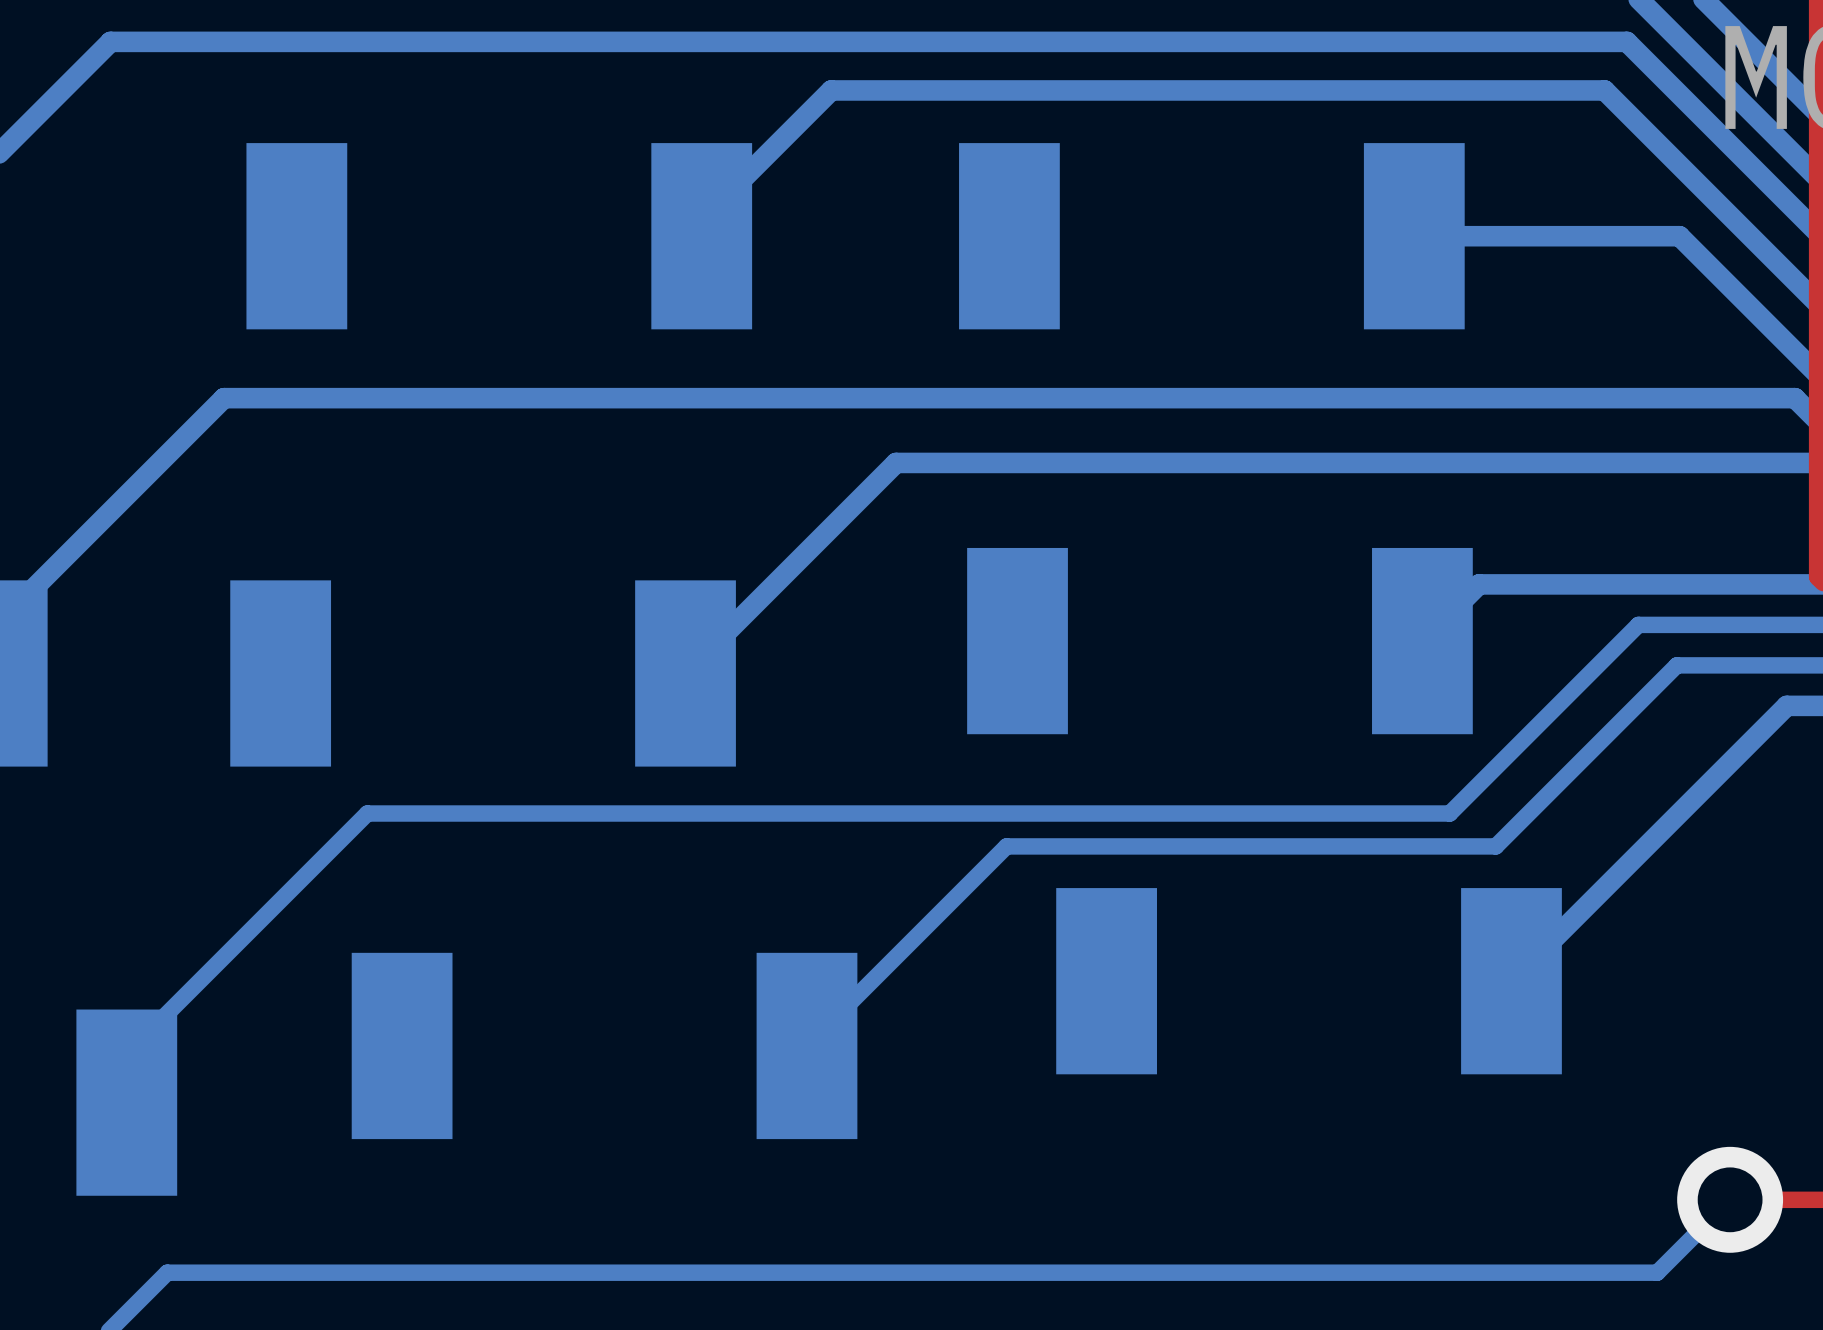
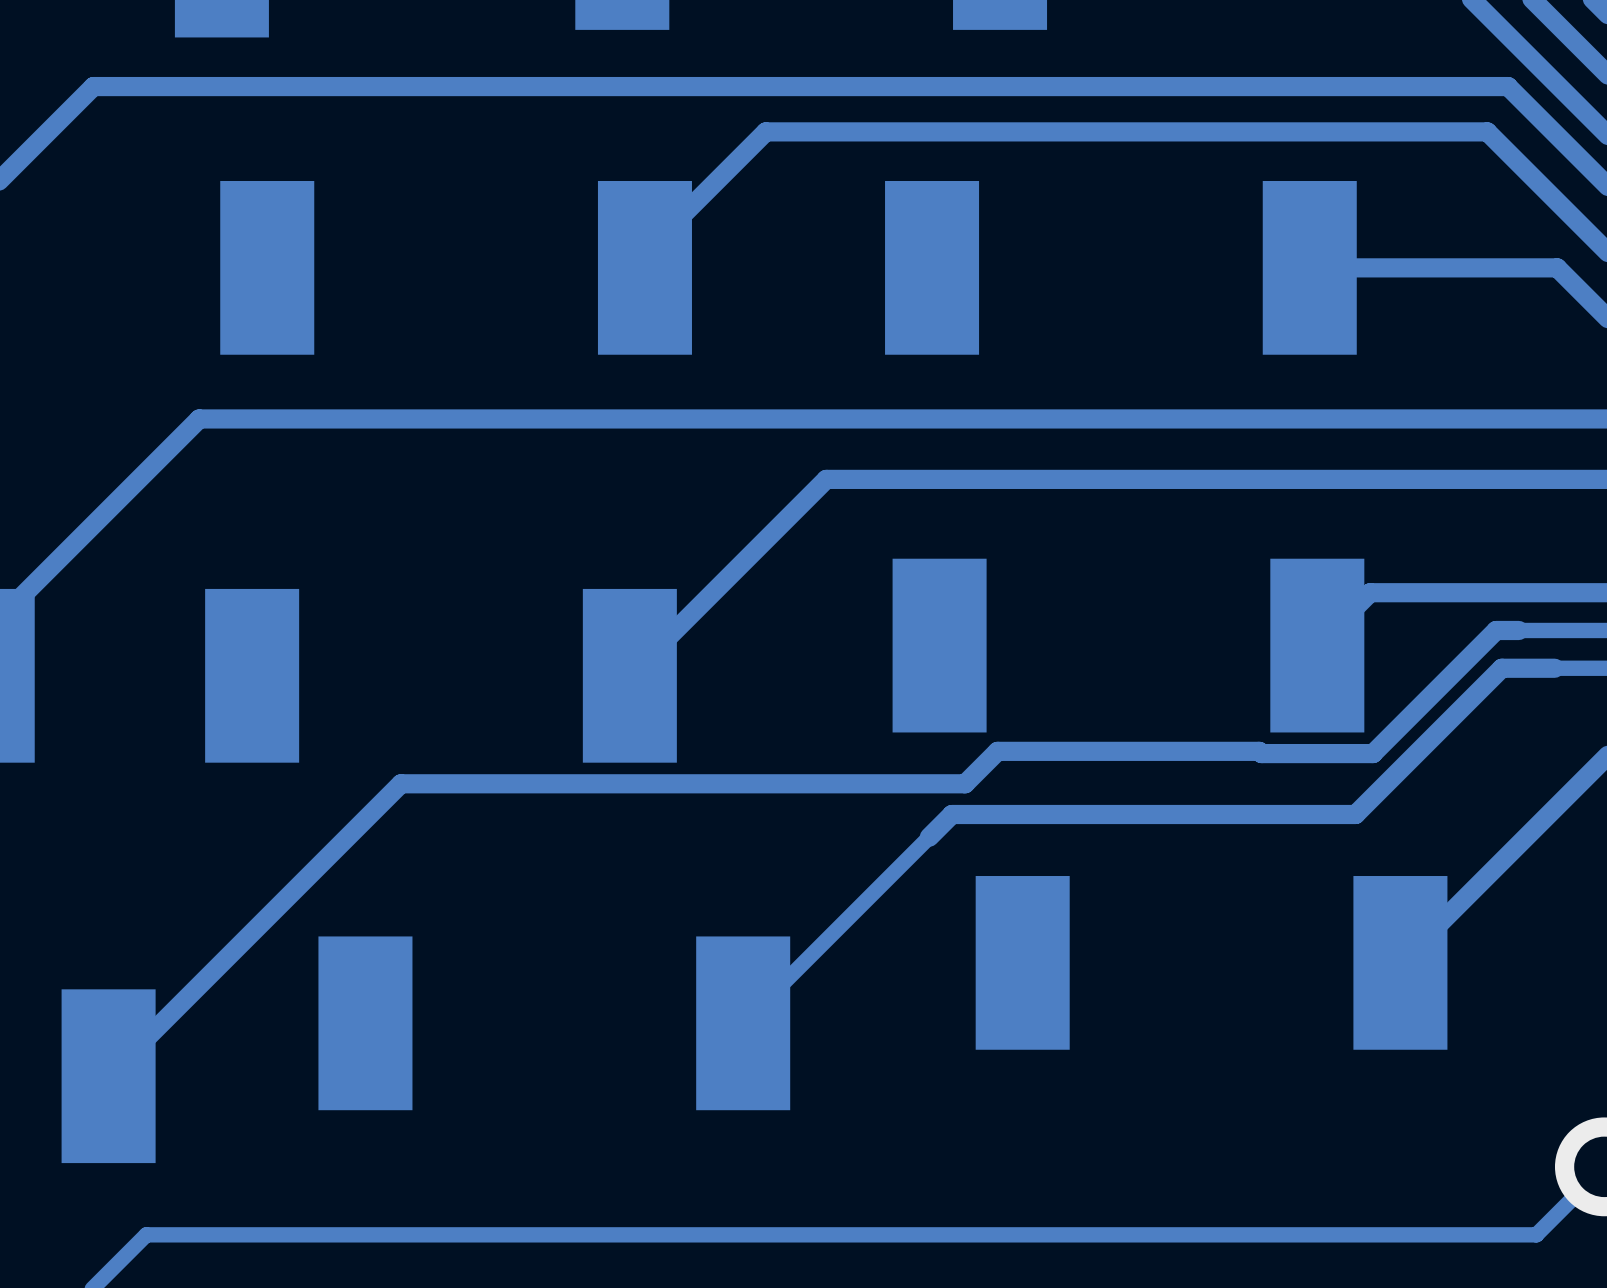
bottom track: (1638, 624) (1449, 813) (367, 813) (126, 1054) (126, 1102) -> (1518, 630) (1496, 630) (1373, 753) (1261, 753) (1259, 751) (997, 751) (965, 783) (401, 783) (108, 1076)
bottom track: (1676, 665) (1495, 846) (1006, 846) -> (1554, 668) (1501, 668) (1355, 814) (952, 814) (929, 837)

